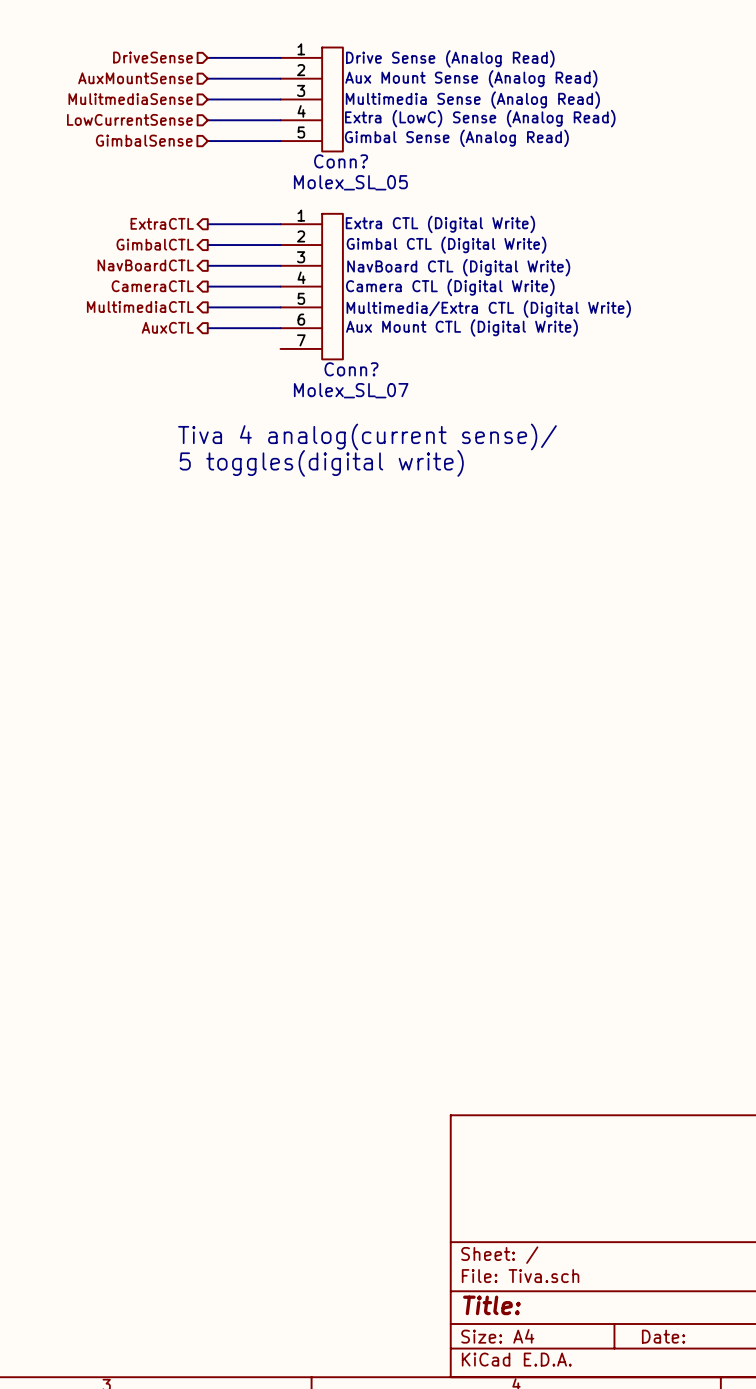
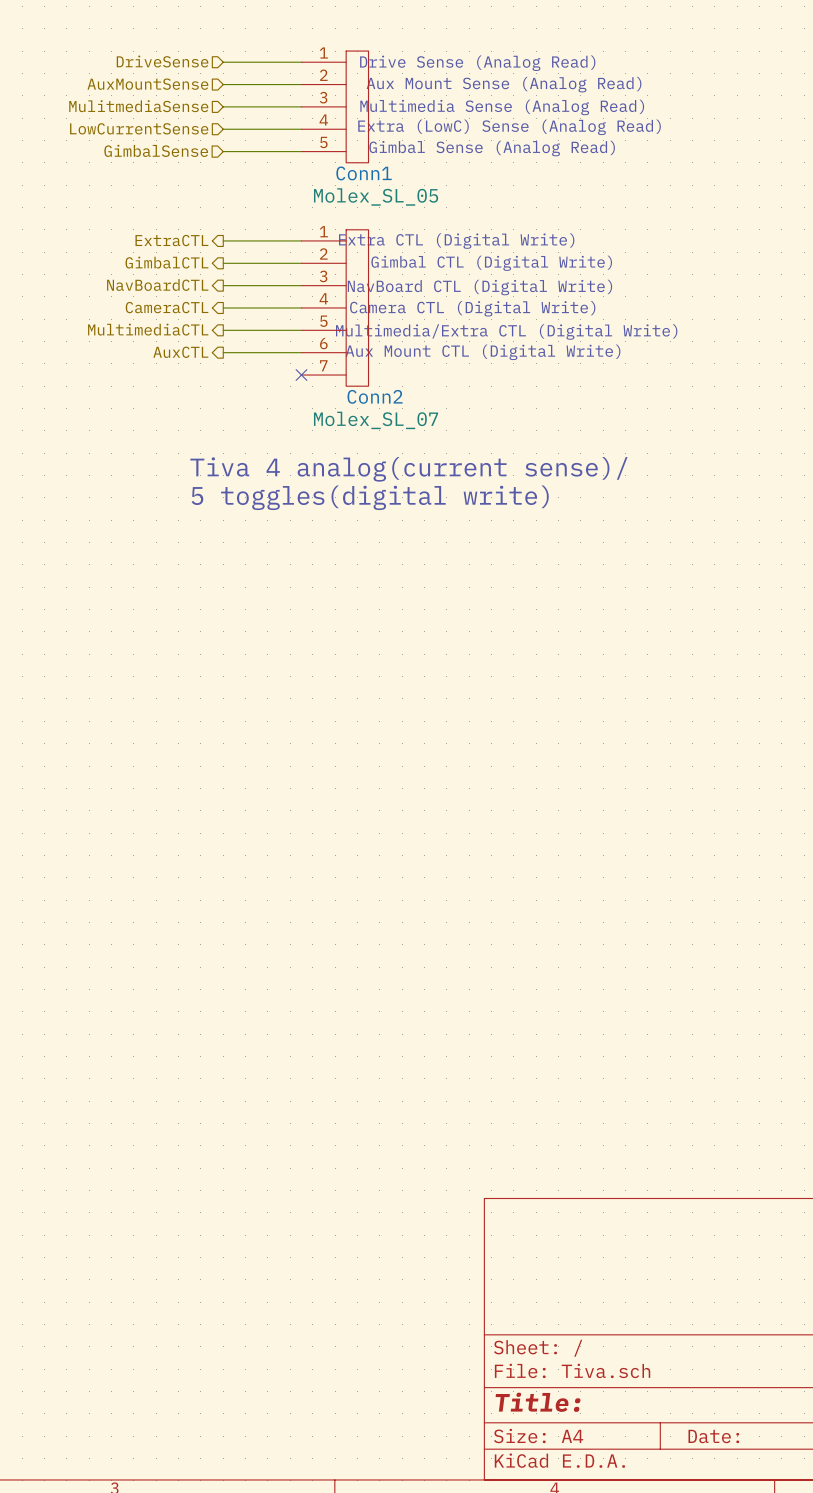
Conn? name: Conn? (341, 161) -> Conn1 (364, 173)
no-connect mark: none -> (301, 375)
Conn? name: Conn? (351, 369) -> Conn2 (375, 396)

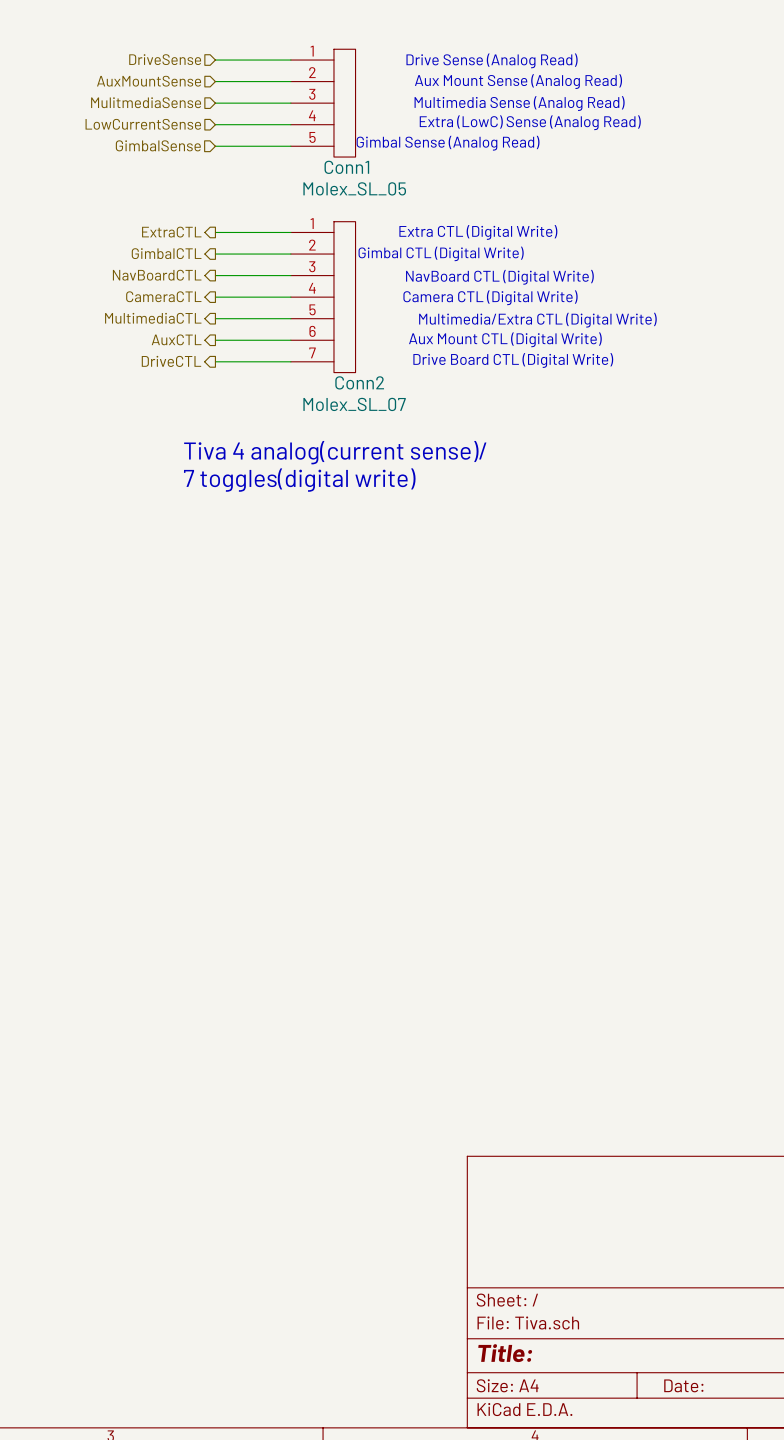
text: none -> Drive Board CTL (Digital Write) (513, 360)
hierarchical label: none -> DriveCTL (171, 361)
wire: none -> (215, 361) (290, 361)
no-connect mark: (301, 375) -> none
text: 5 toggles(digital write) (370, 497) -> 7 toggles(digital write) (299, 480)

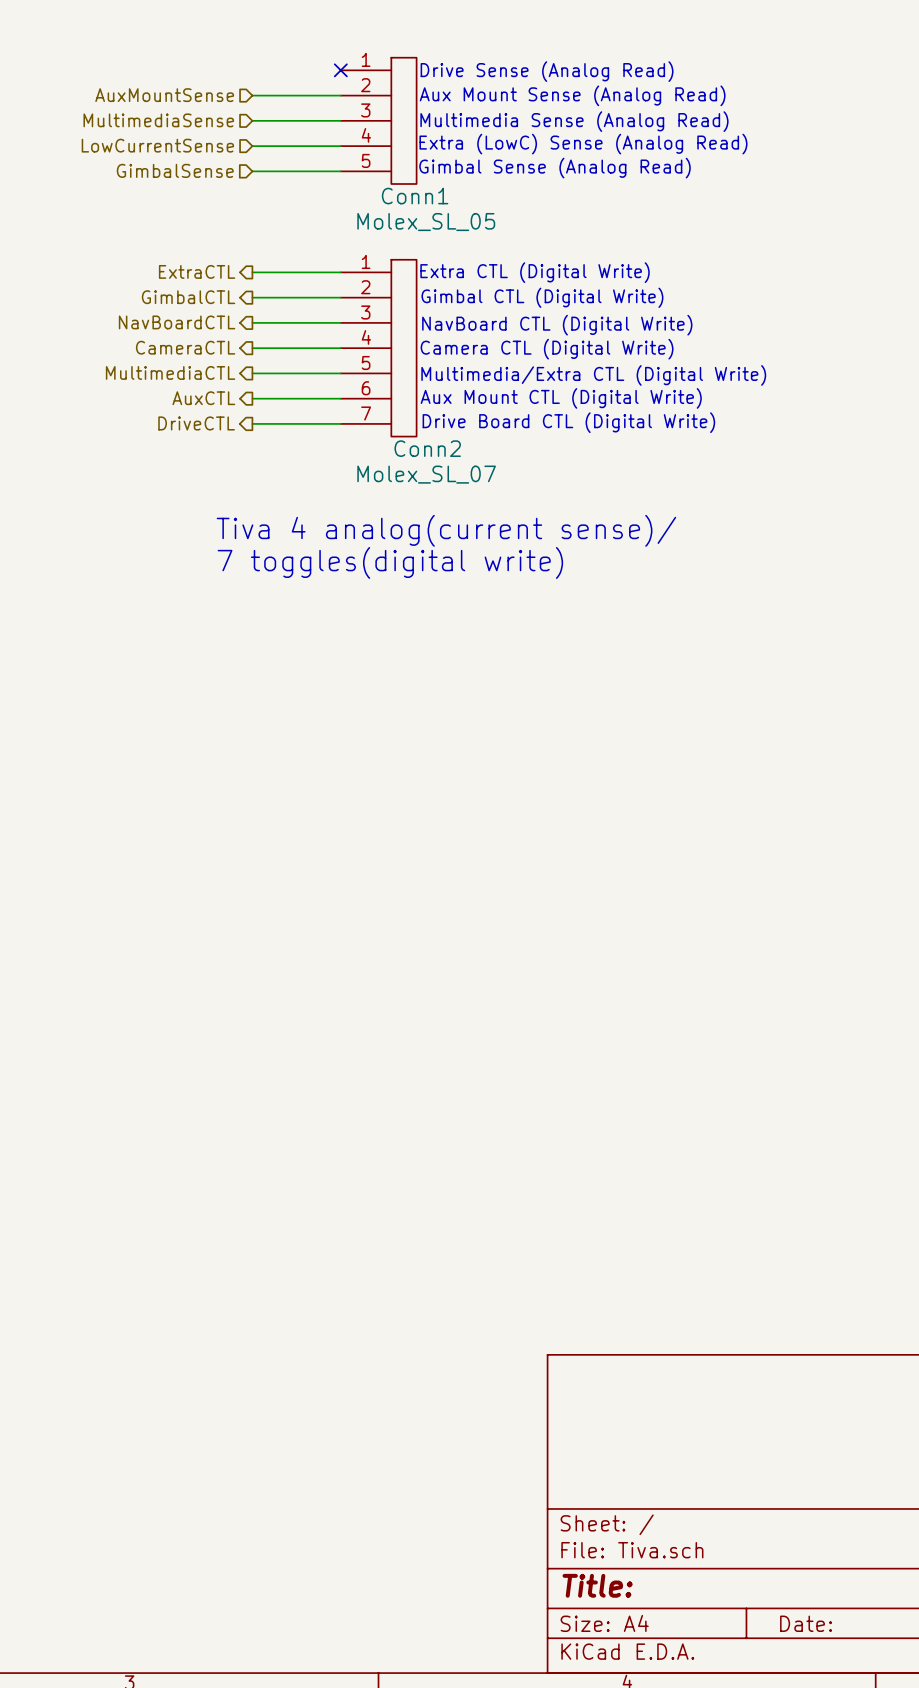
hierarchical label: DriveSense (165, 59) -> none
wire: (215, 60) (290, 60) -> none
no-connect mark: none -> (340, 70)
hierarchical label: MulitmediaSense (146, 102) -> MultimediaSense (158, 120)

